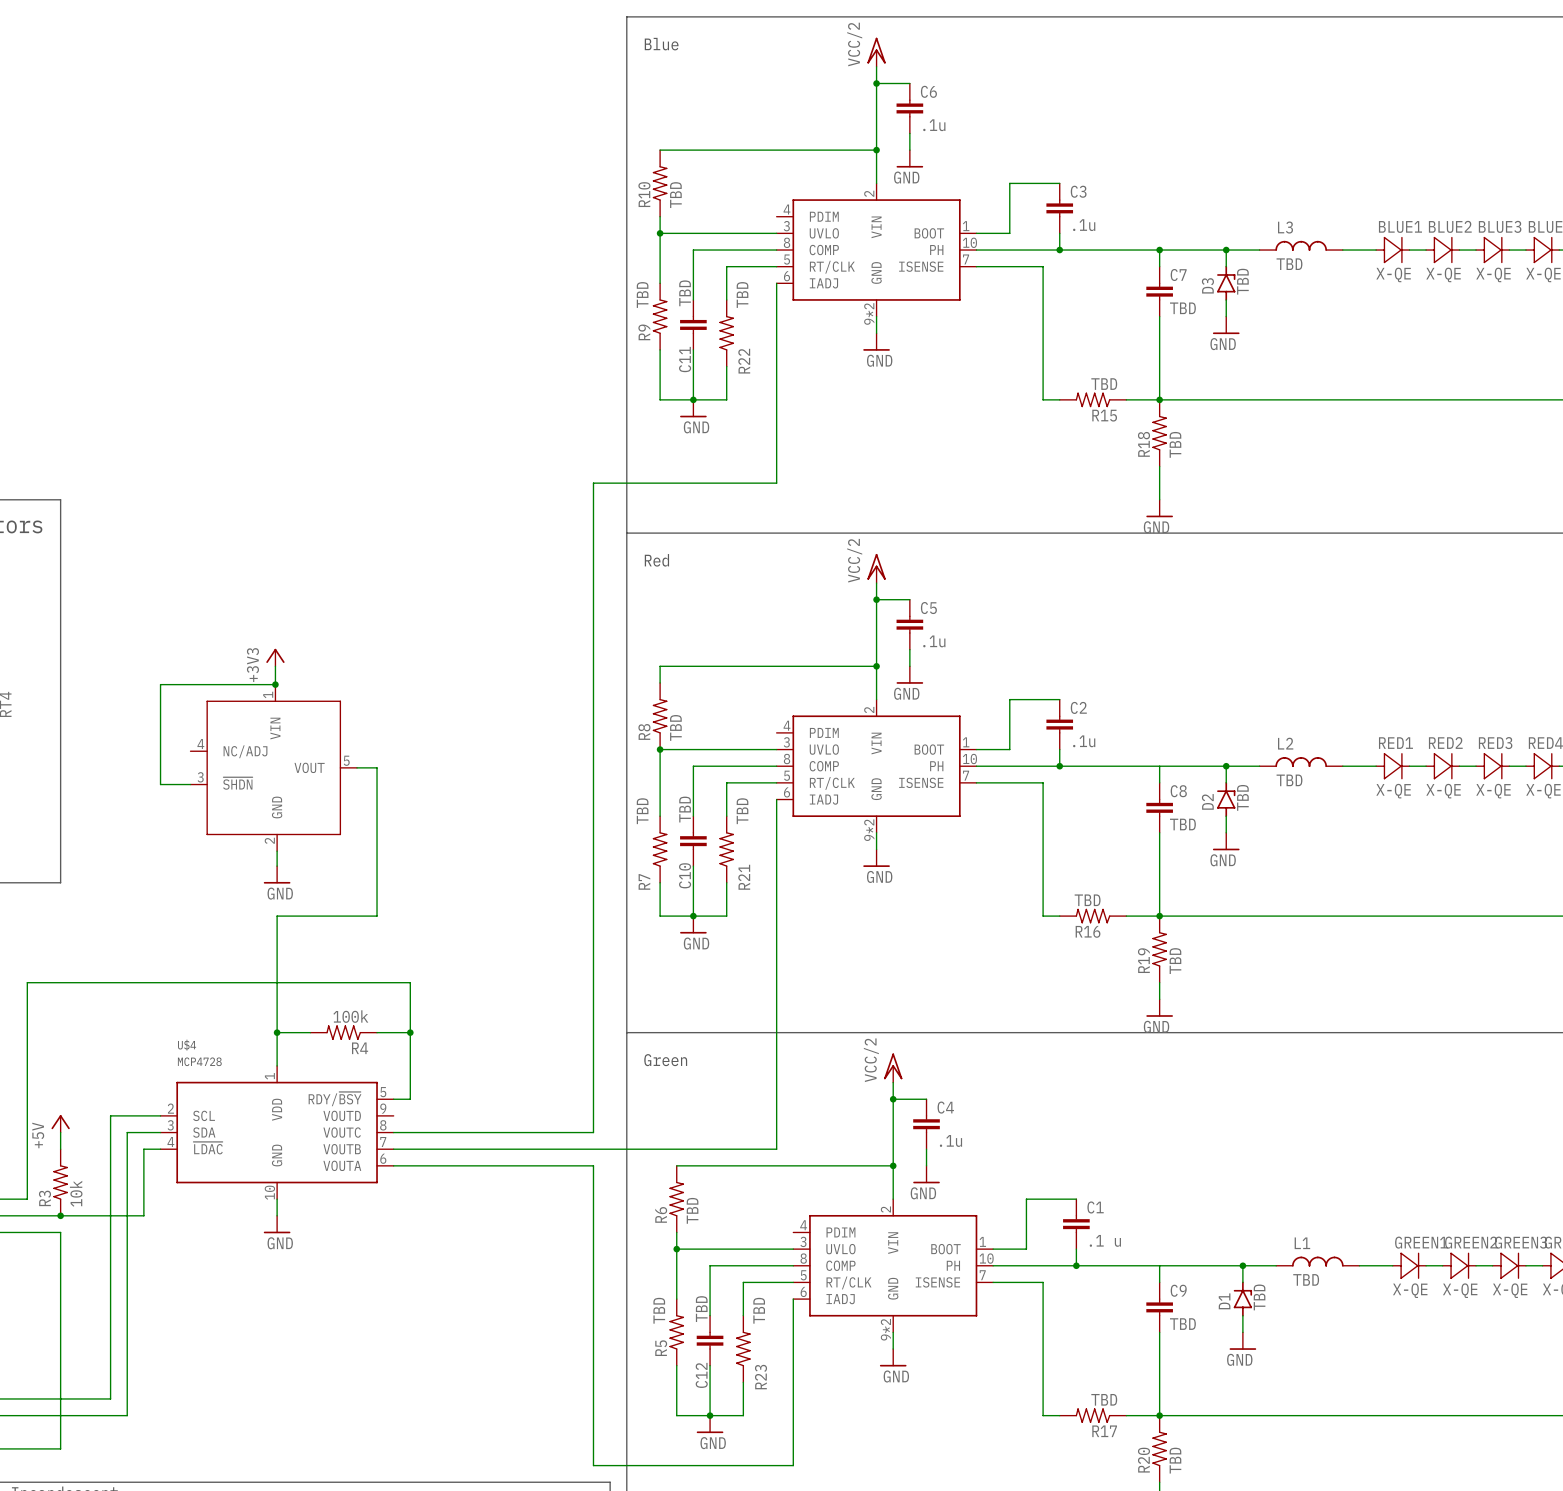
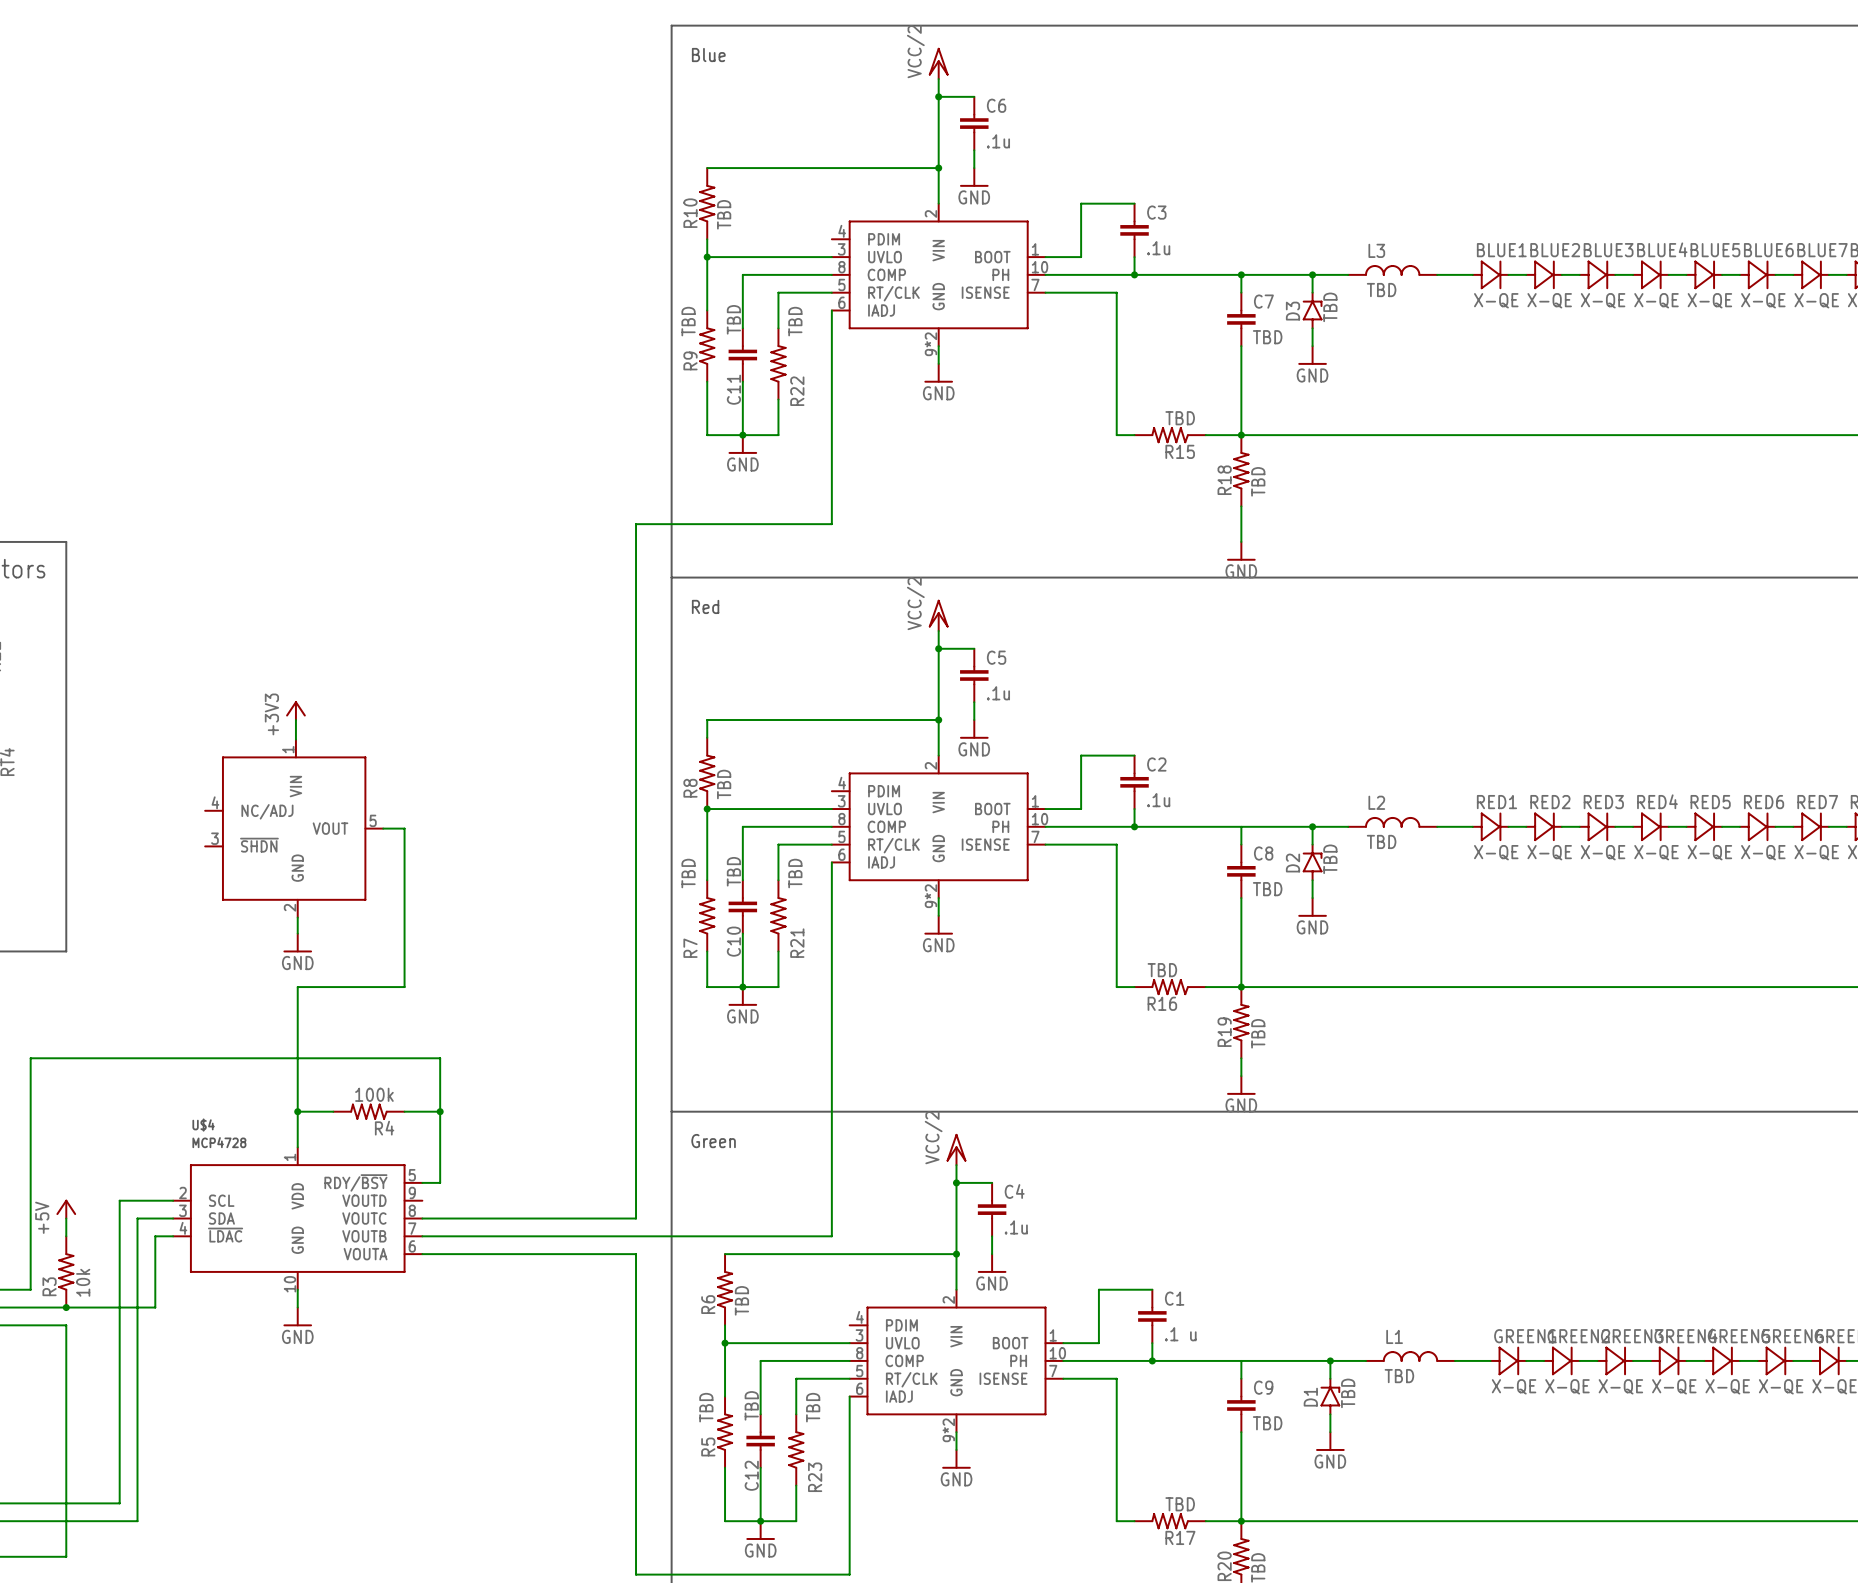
wire: (275, 684) (160, 684) (160, 784) (190, 784) -> none
junction: (275, 684) -> none

